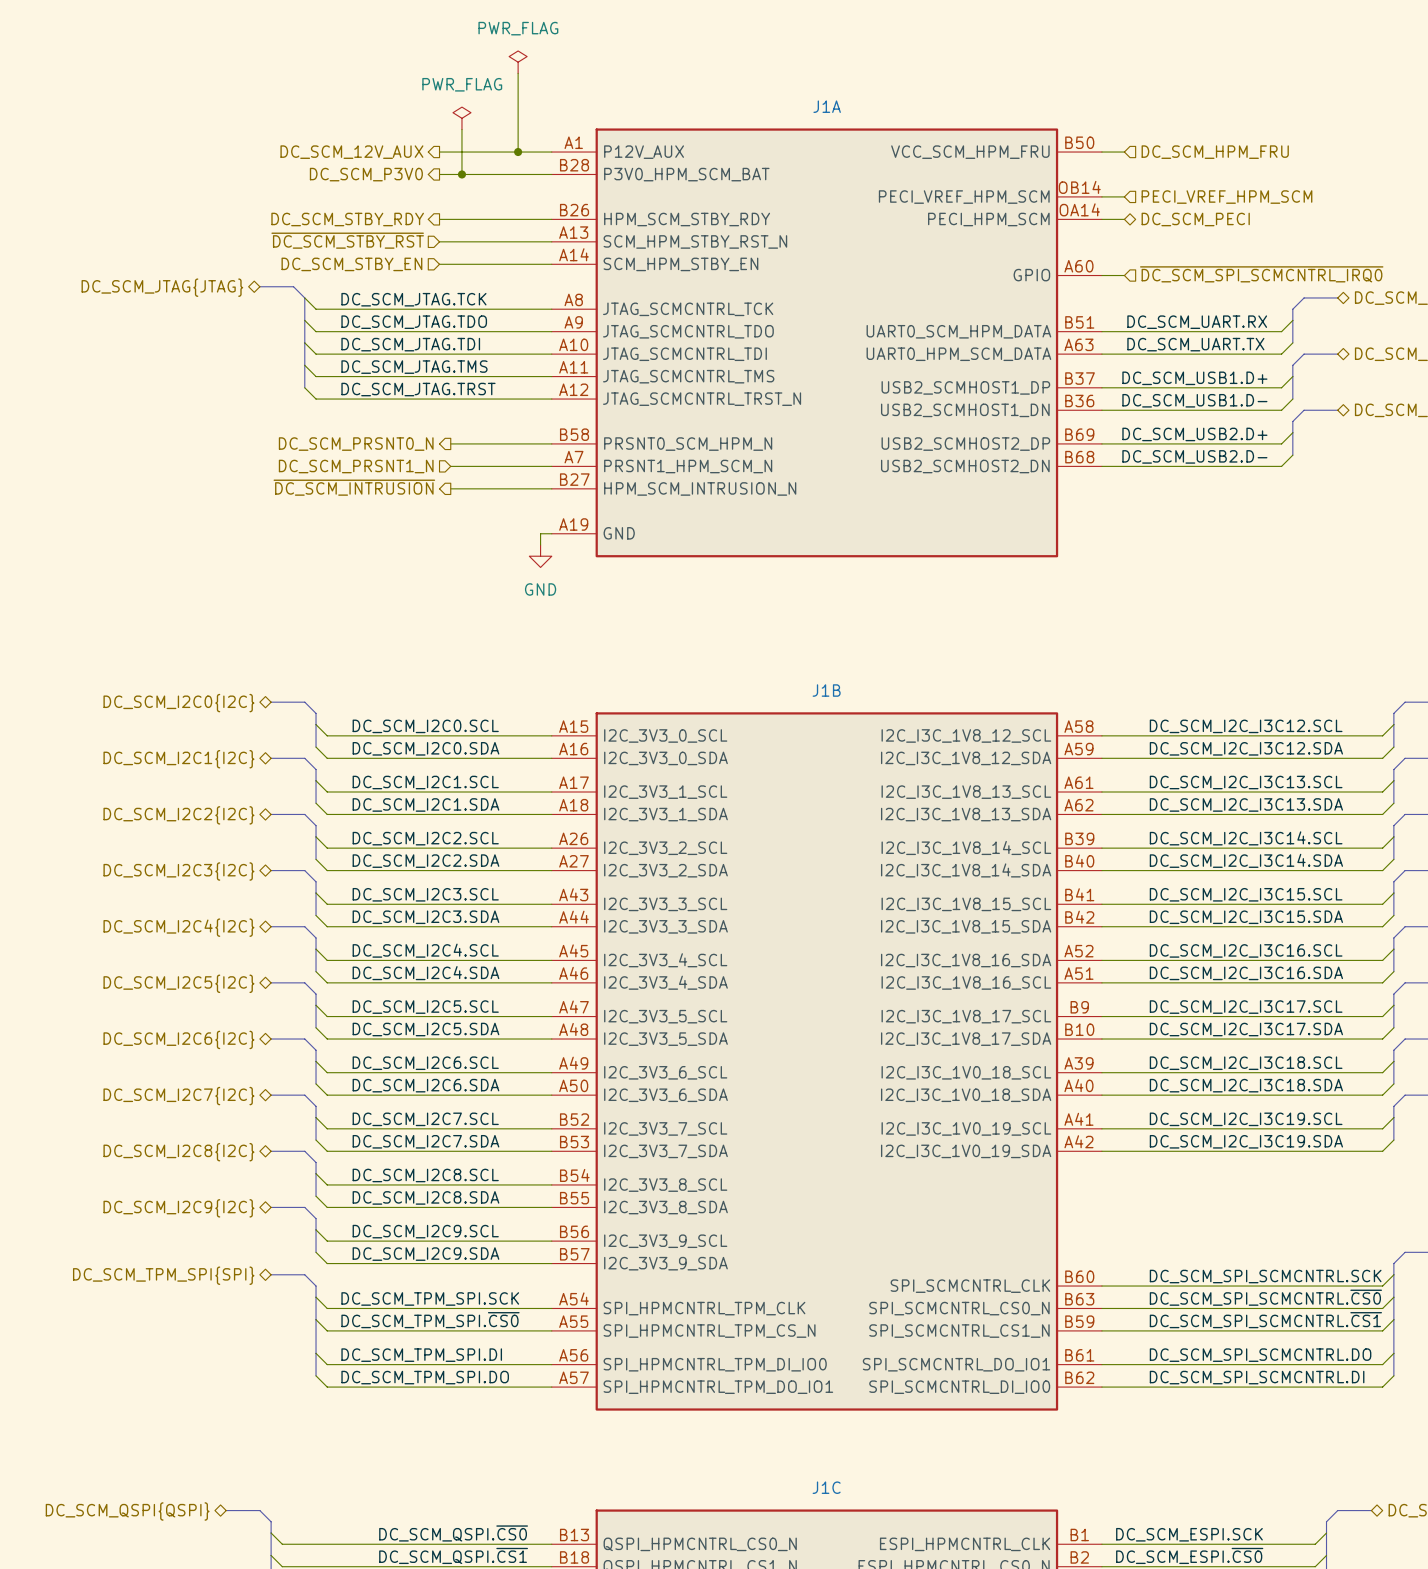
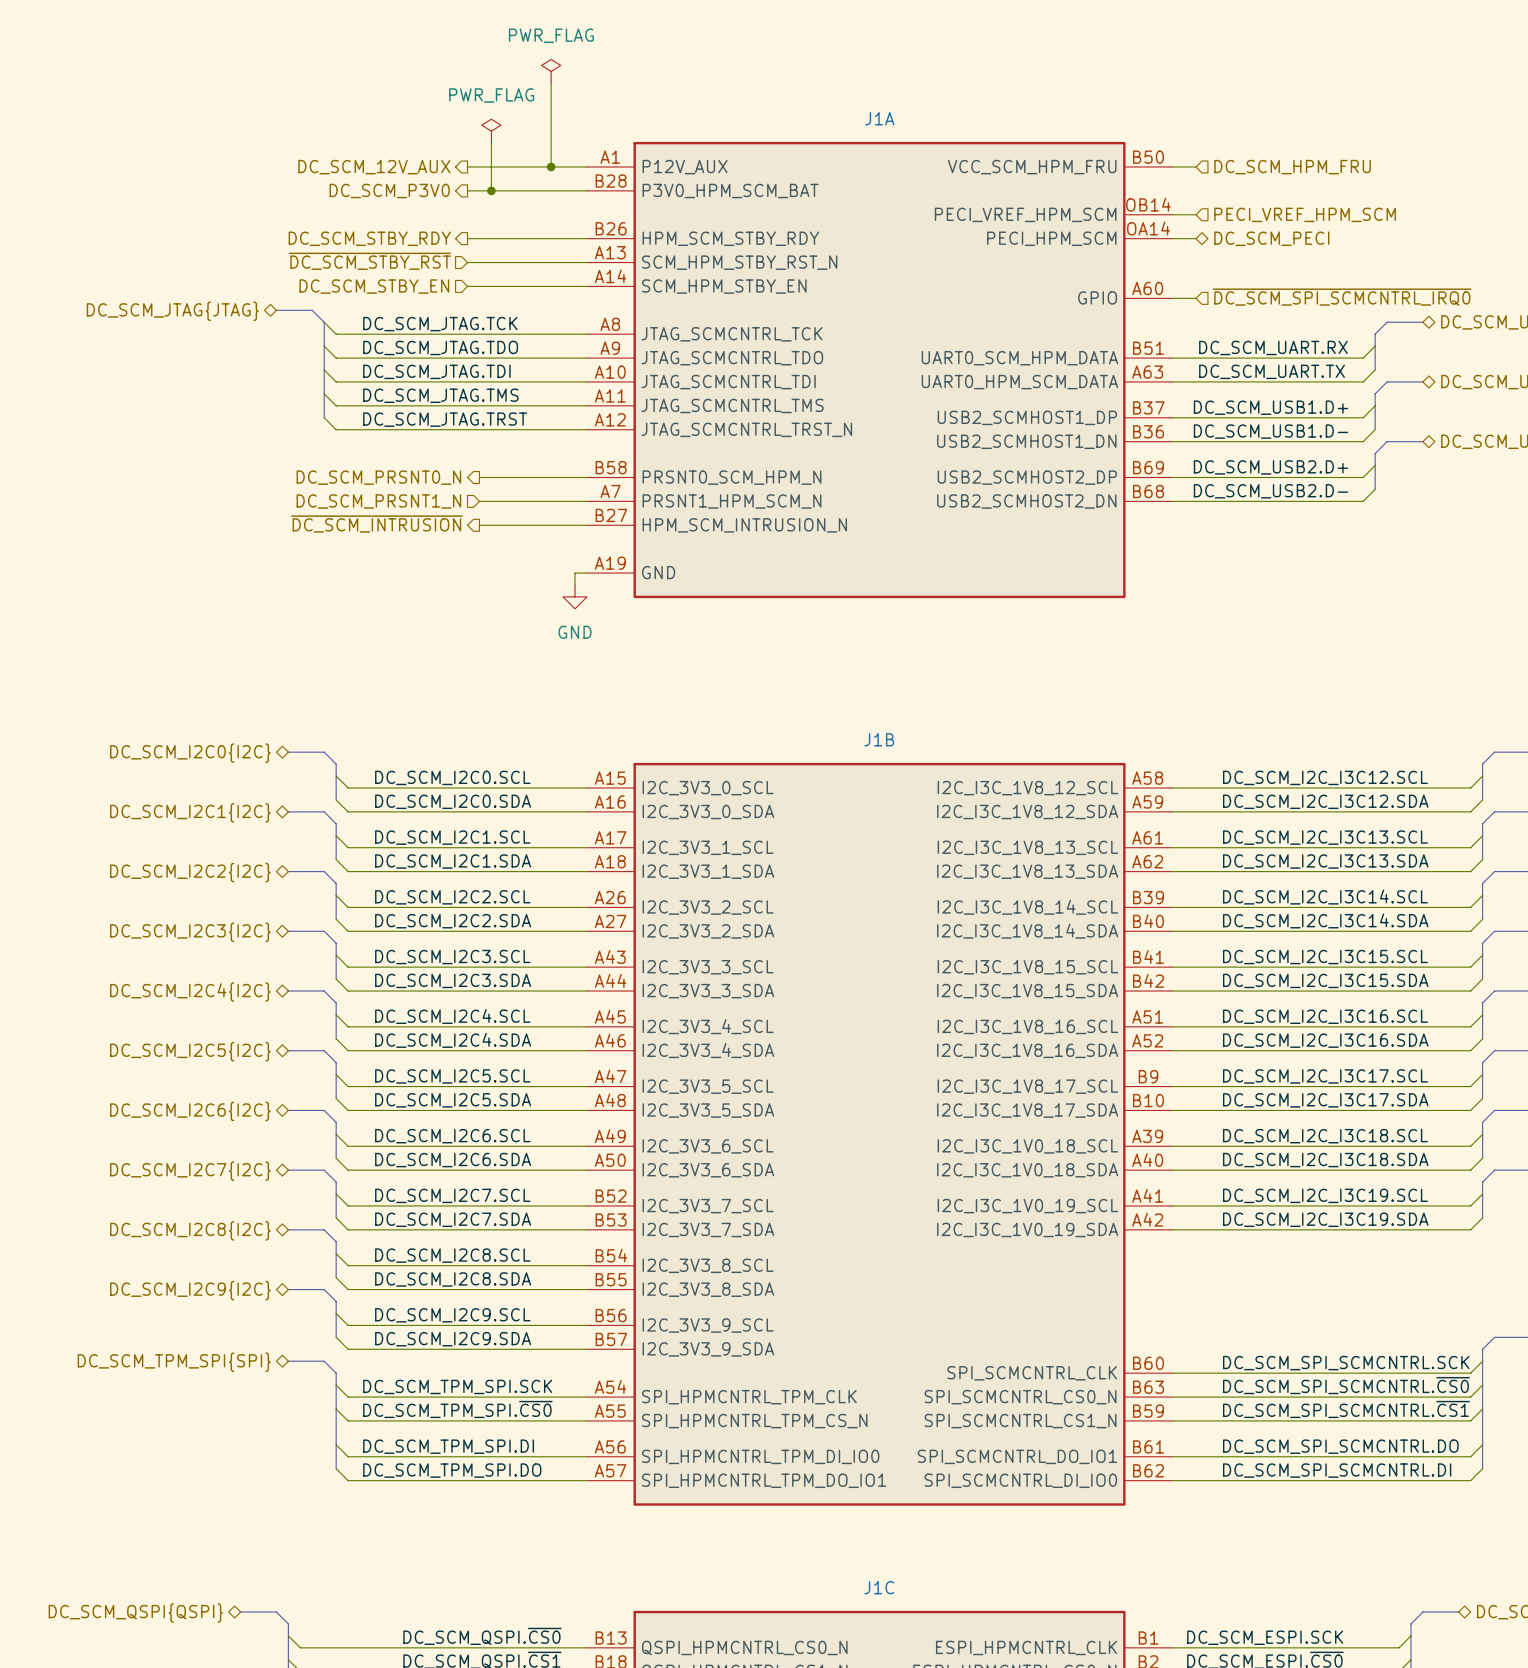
J1B pin number: A52 (1078, 951) -> A51 (1147, 1016)
J1B pin name: I2C_I3C_1V8_16_SDA (966, 960) -> I2C_I3C_1V8_16_SCL (1027, 1026)
J1B pin number: A51 (1078, 973) -> A52 (1147, 1040)
J1B pin name: I2C_I3C_1V8_16_SCL (966, 982) -> I2C_I3C_1V8_16_SDA (1027, 1050)

